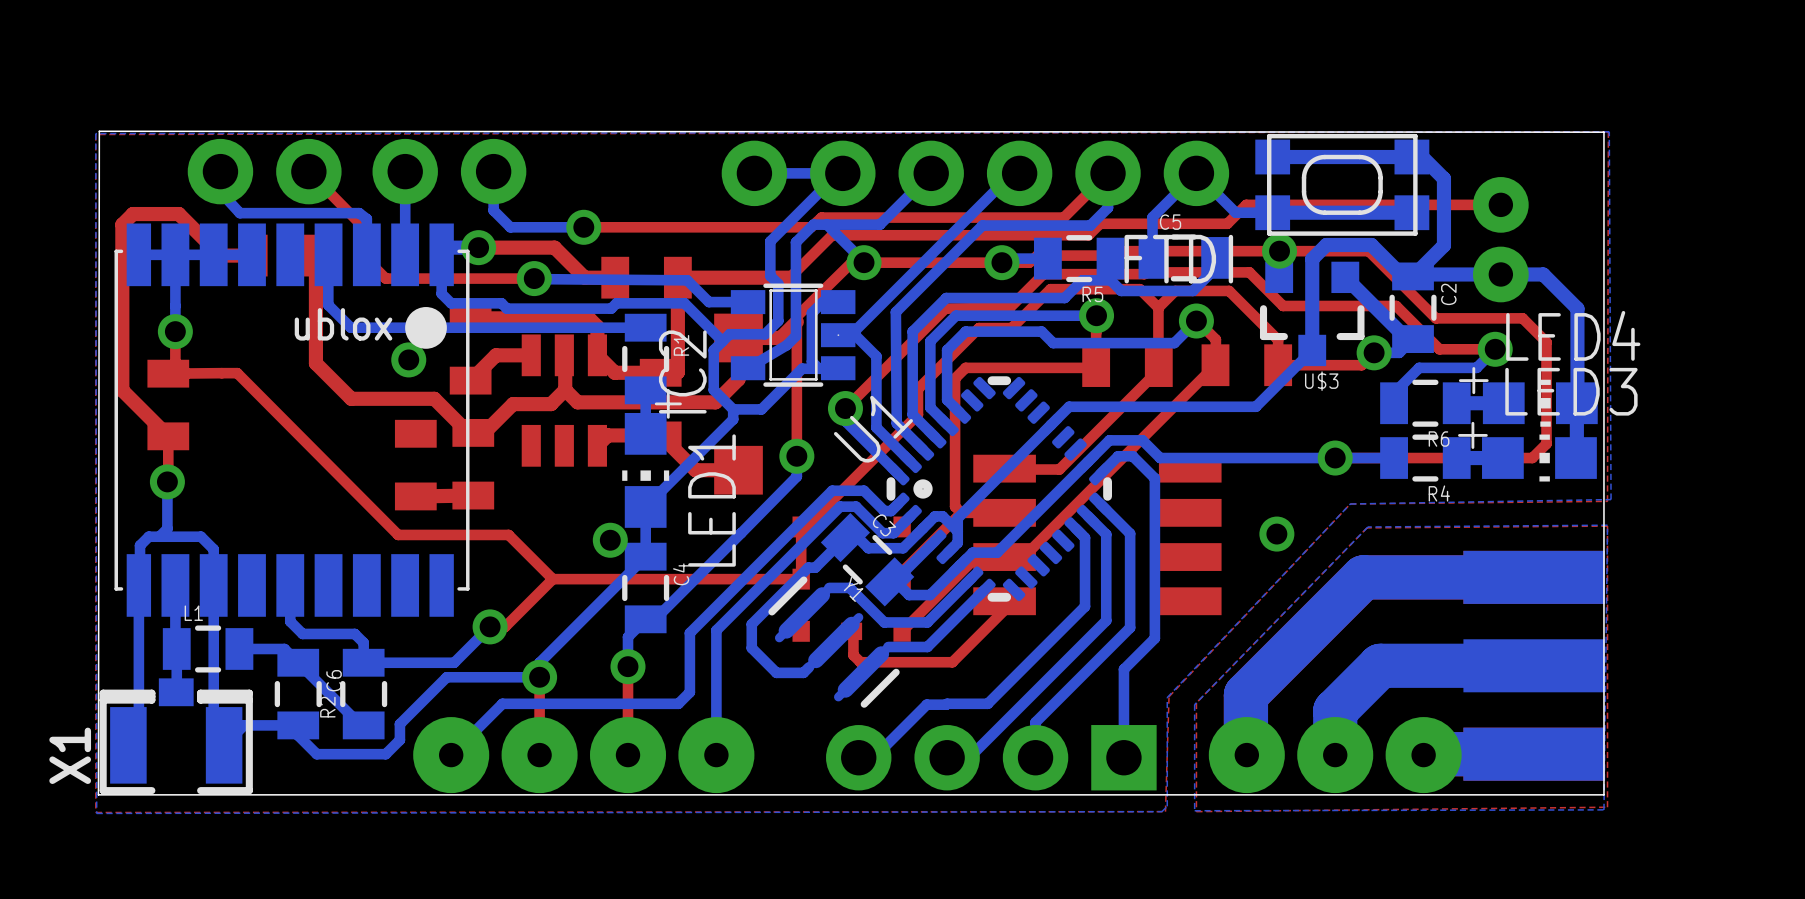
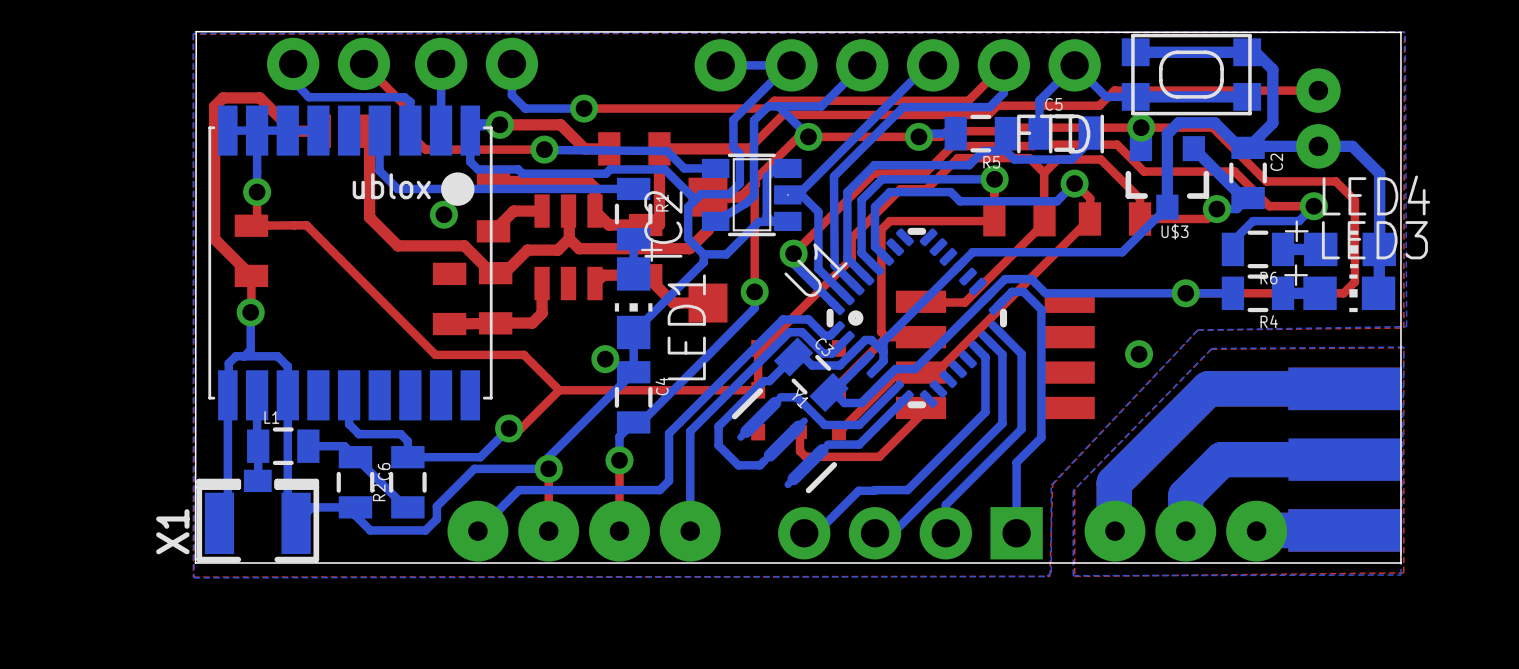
top track: none -> (542, 283) (542, 313) (532, 323) (495, 323)

